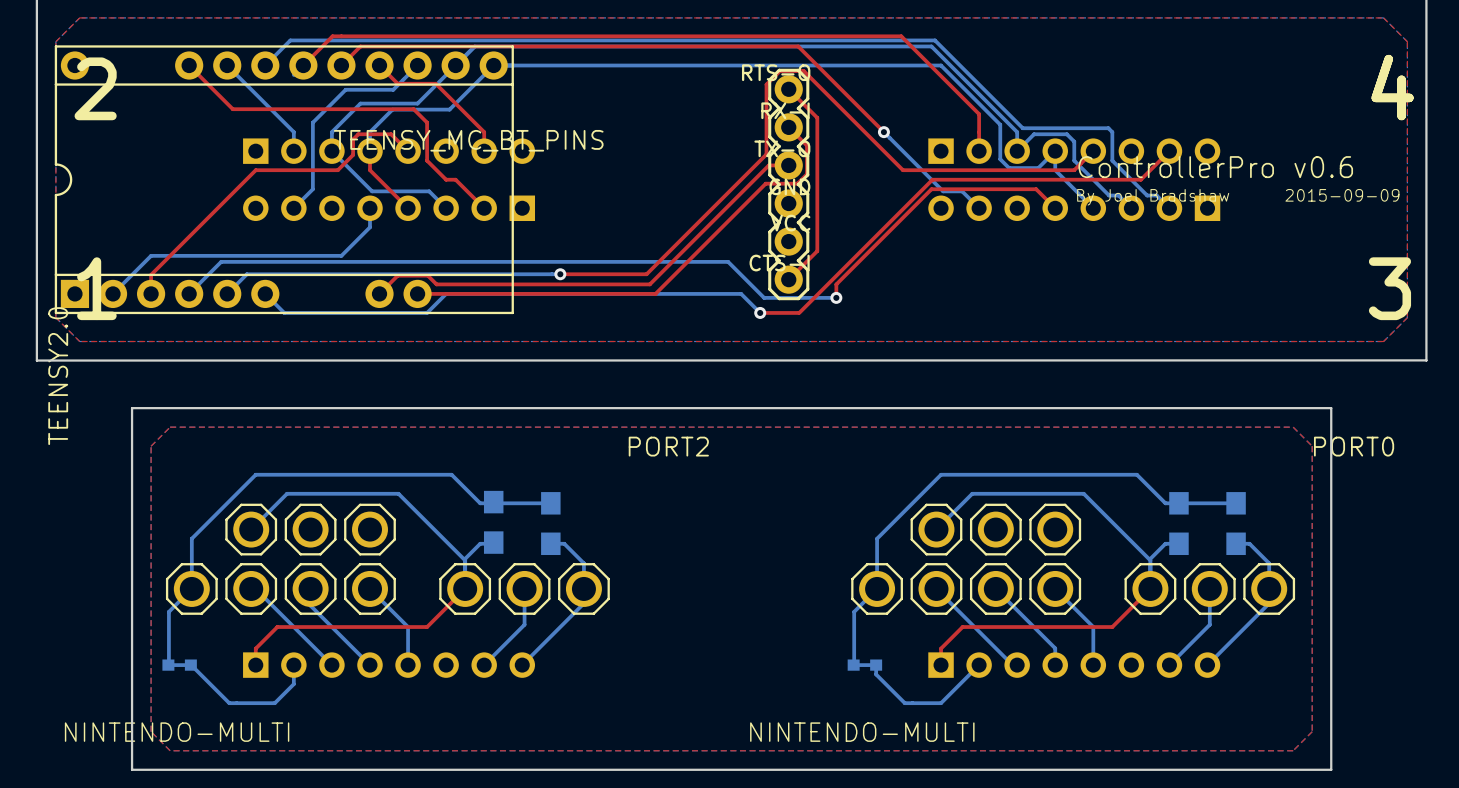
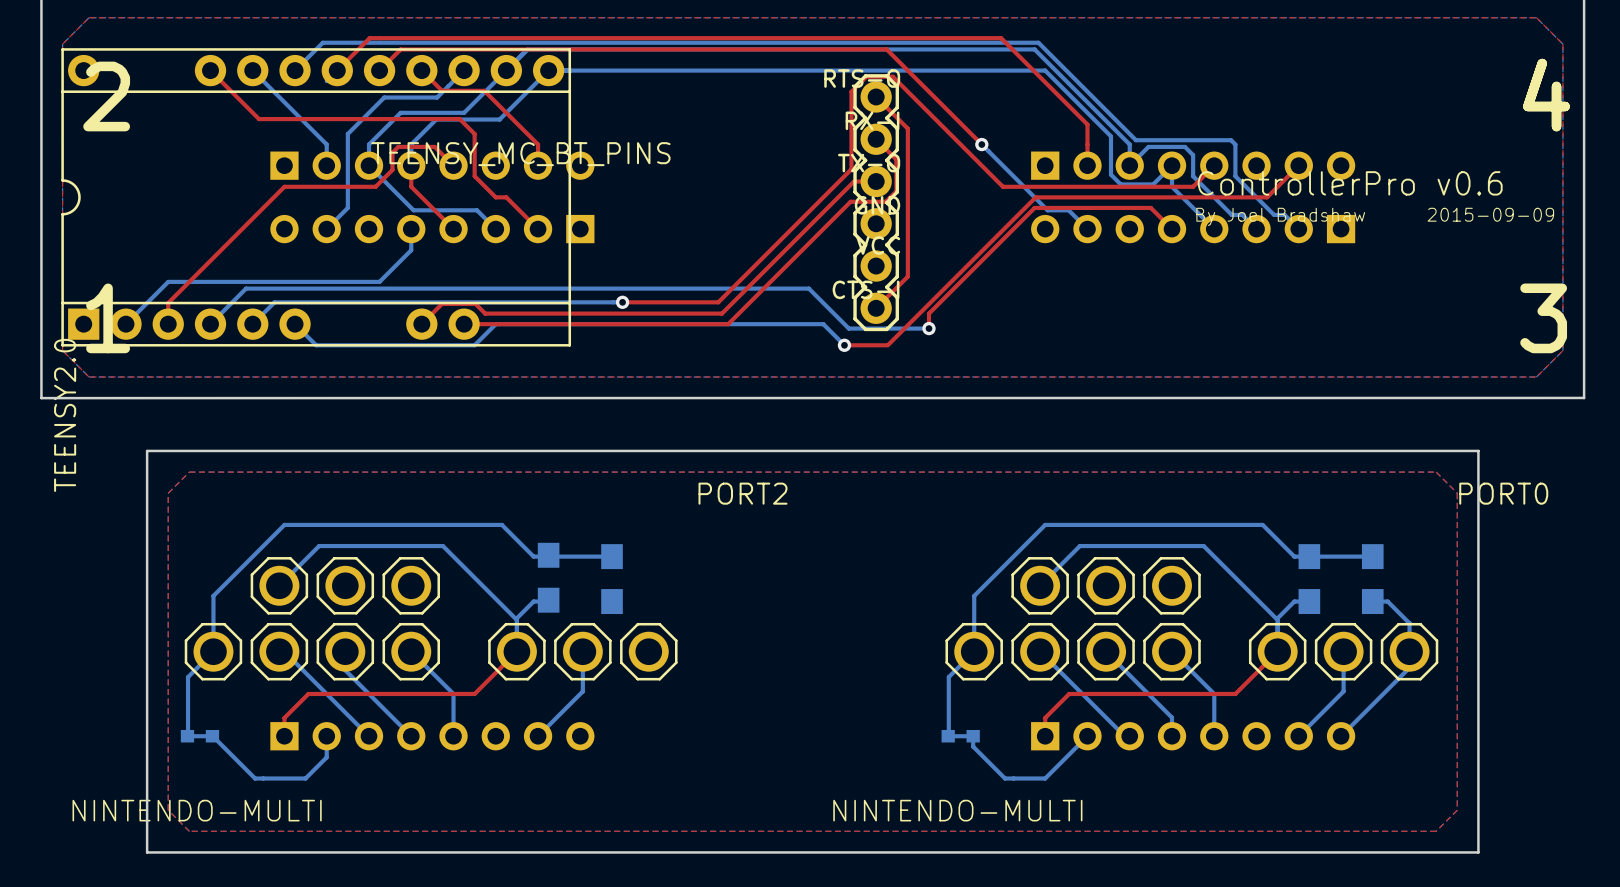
bottom track: (550, 543) (564, 543) (583, 563) (583, 588) -> none
bottom track: (583, 603) (522, 665) -> none

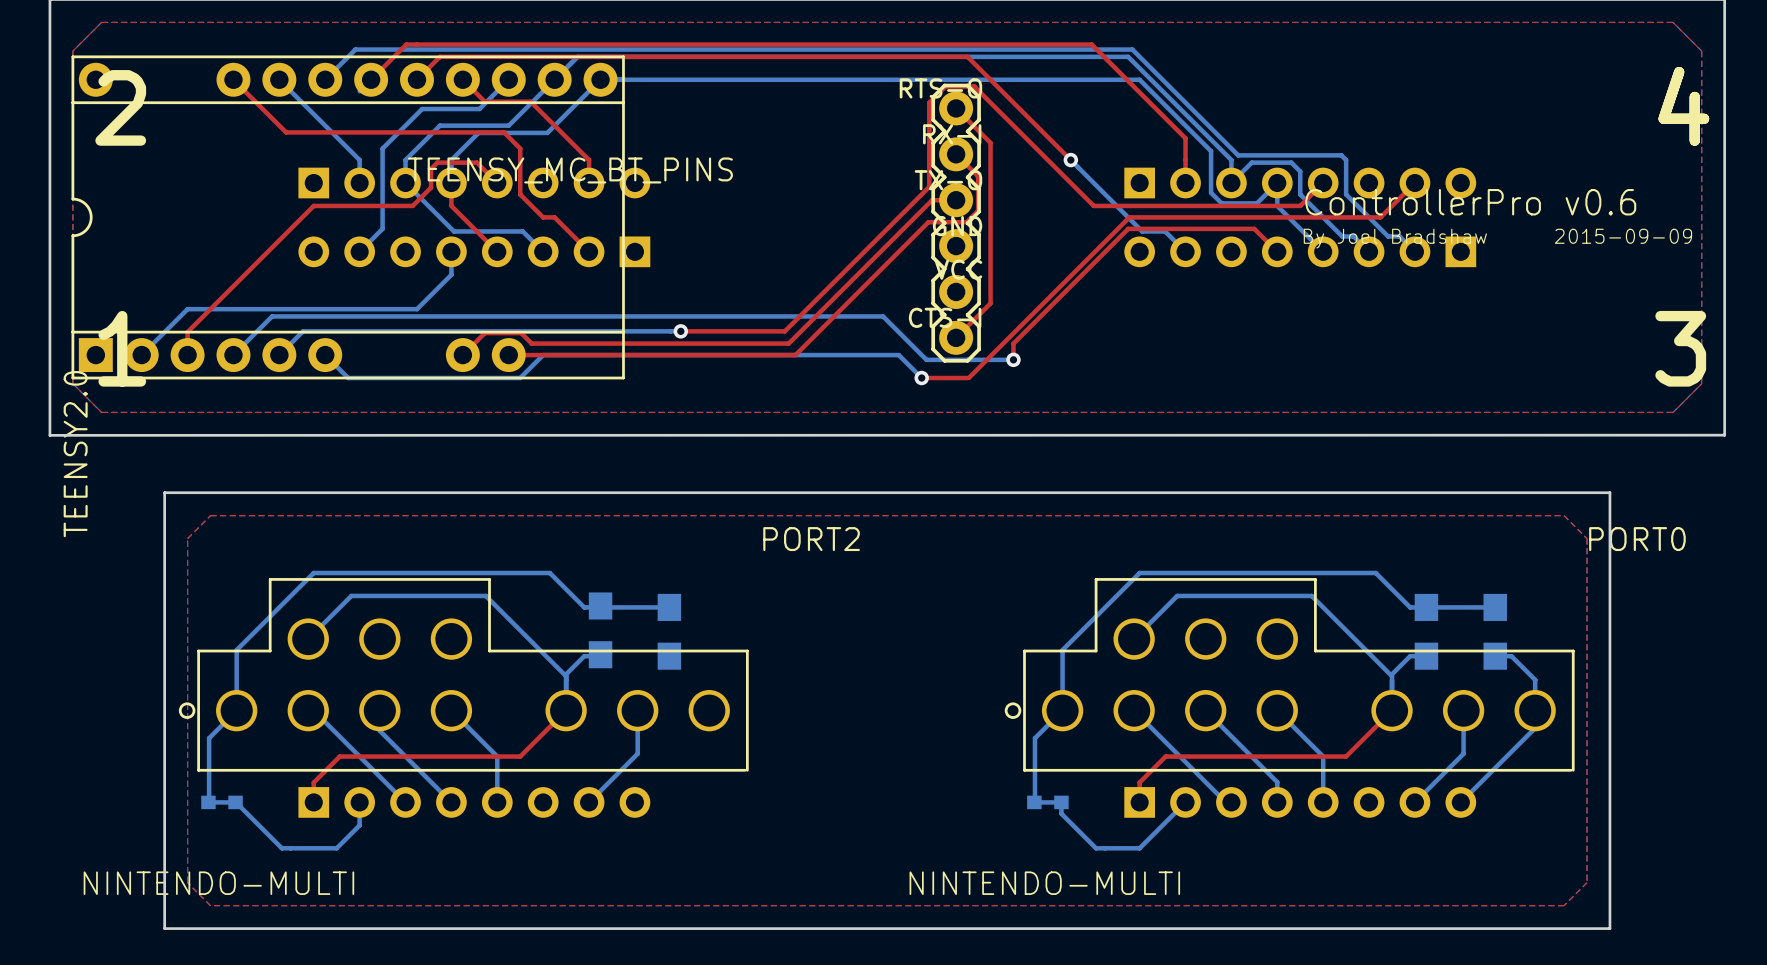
PORT2 footprint: [184, 557, 678, 681] -> [178, 578, 749, 772]
PORT0 footprint: [945, 557, 1439, 681] -> [1004, 578, 1575, 772]

